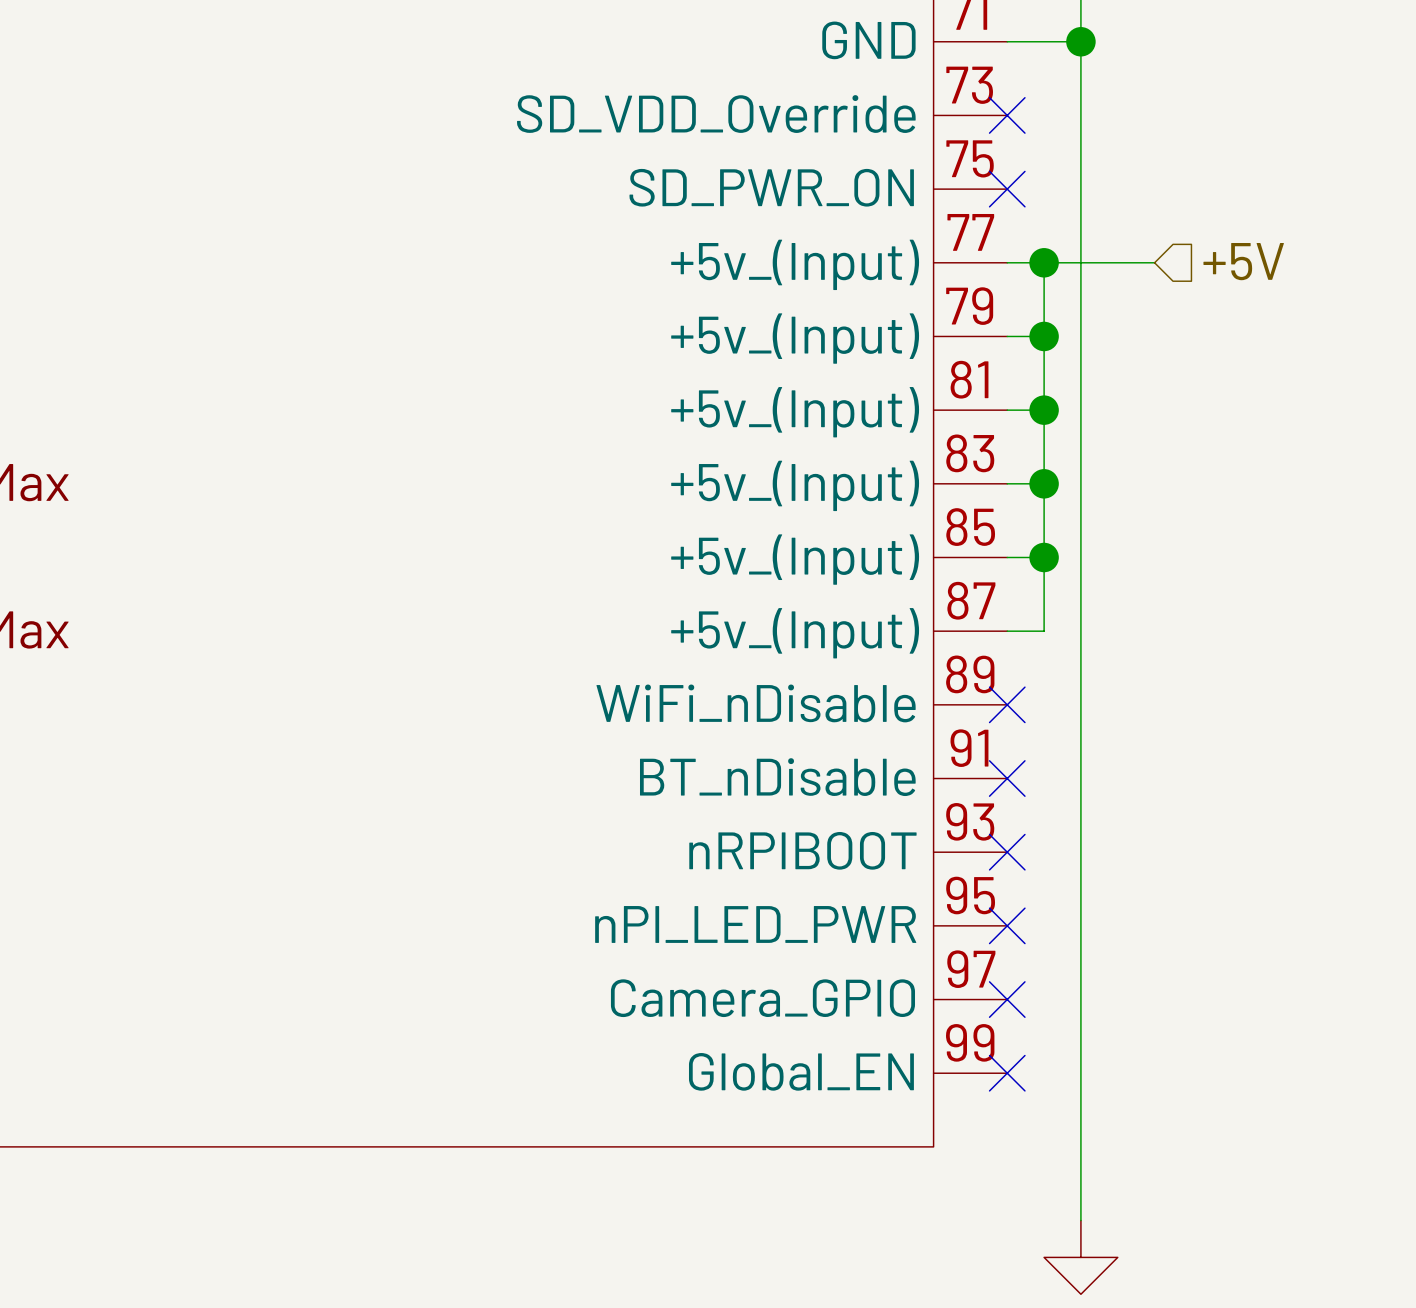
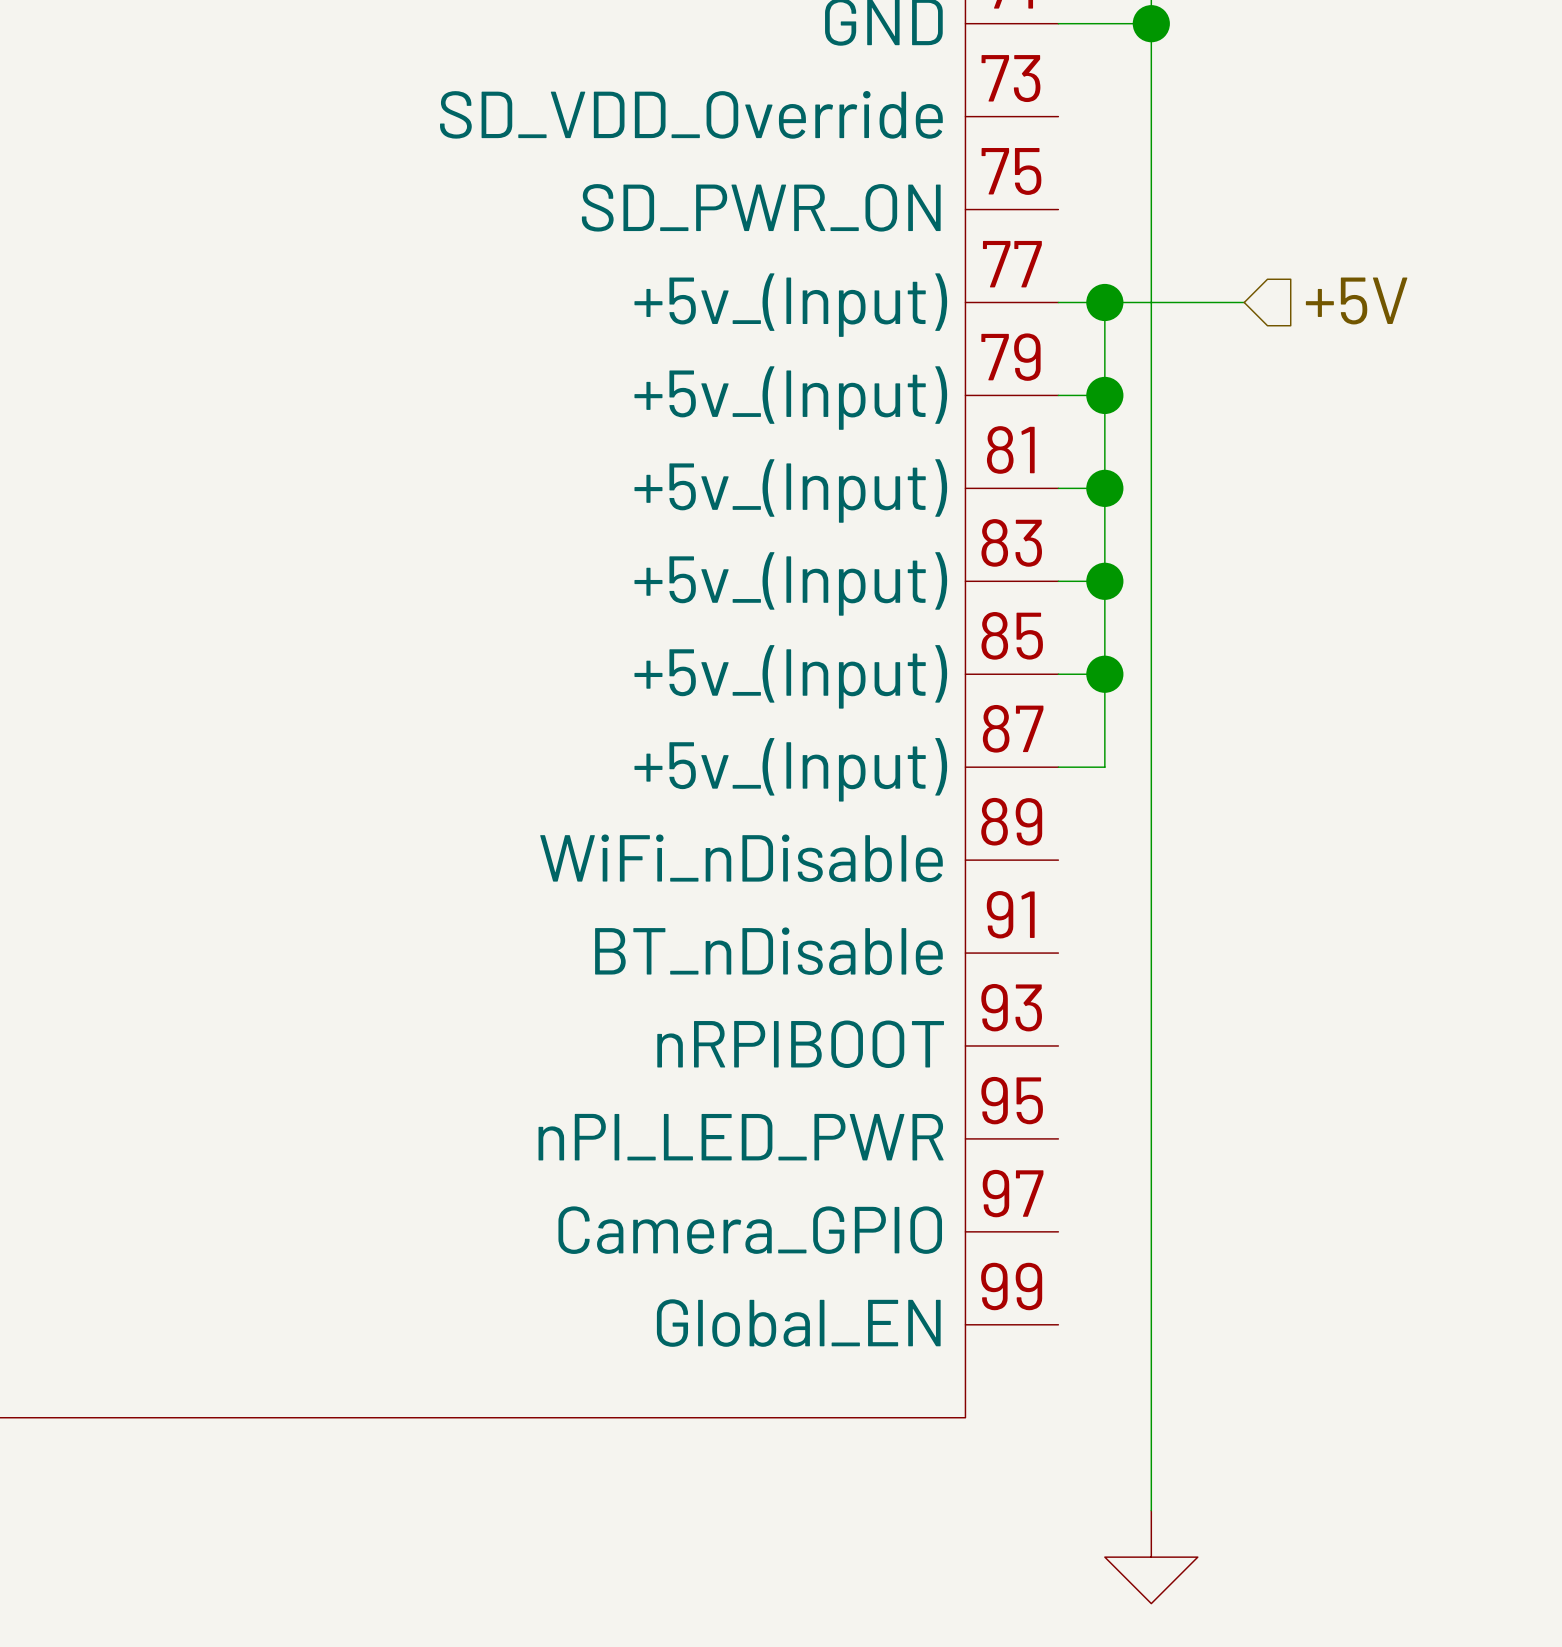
no-connect mark: (1007, 115) -> none
no-connect mark: (1007, 189) -> none
no-connect mark: (1007, 704) -> none
no-connect mark: (1007, 778) -> none
no-connect mark: (1007, 852) -> none
no-connect mark: (1007, 925) -> none
no-connect mark: (1007, 999) -> none
no-connect mark: (1007, 1073) -> none

